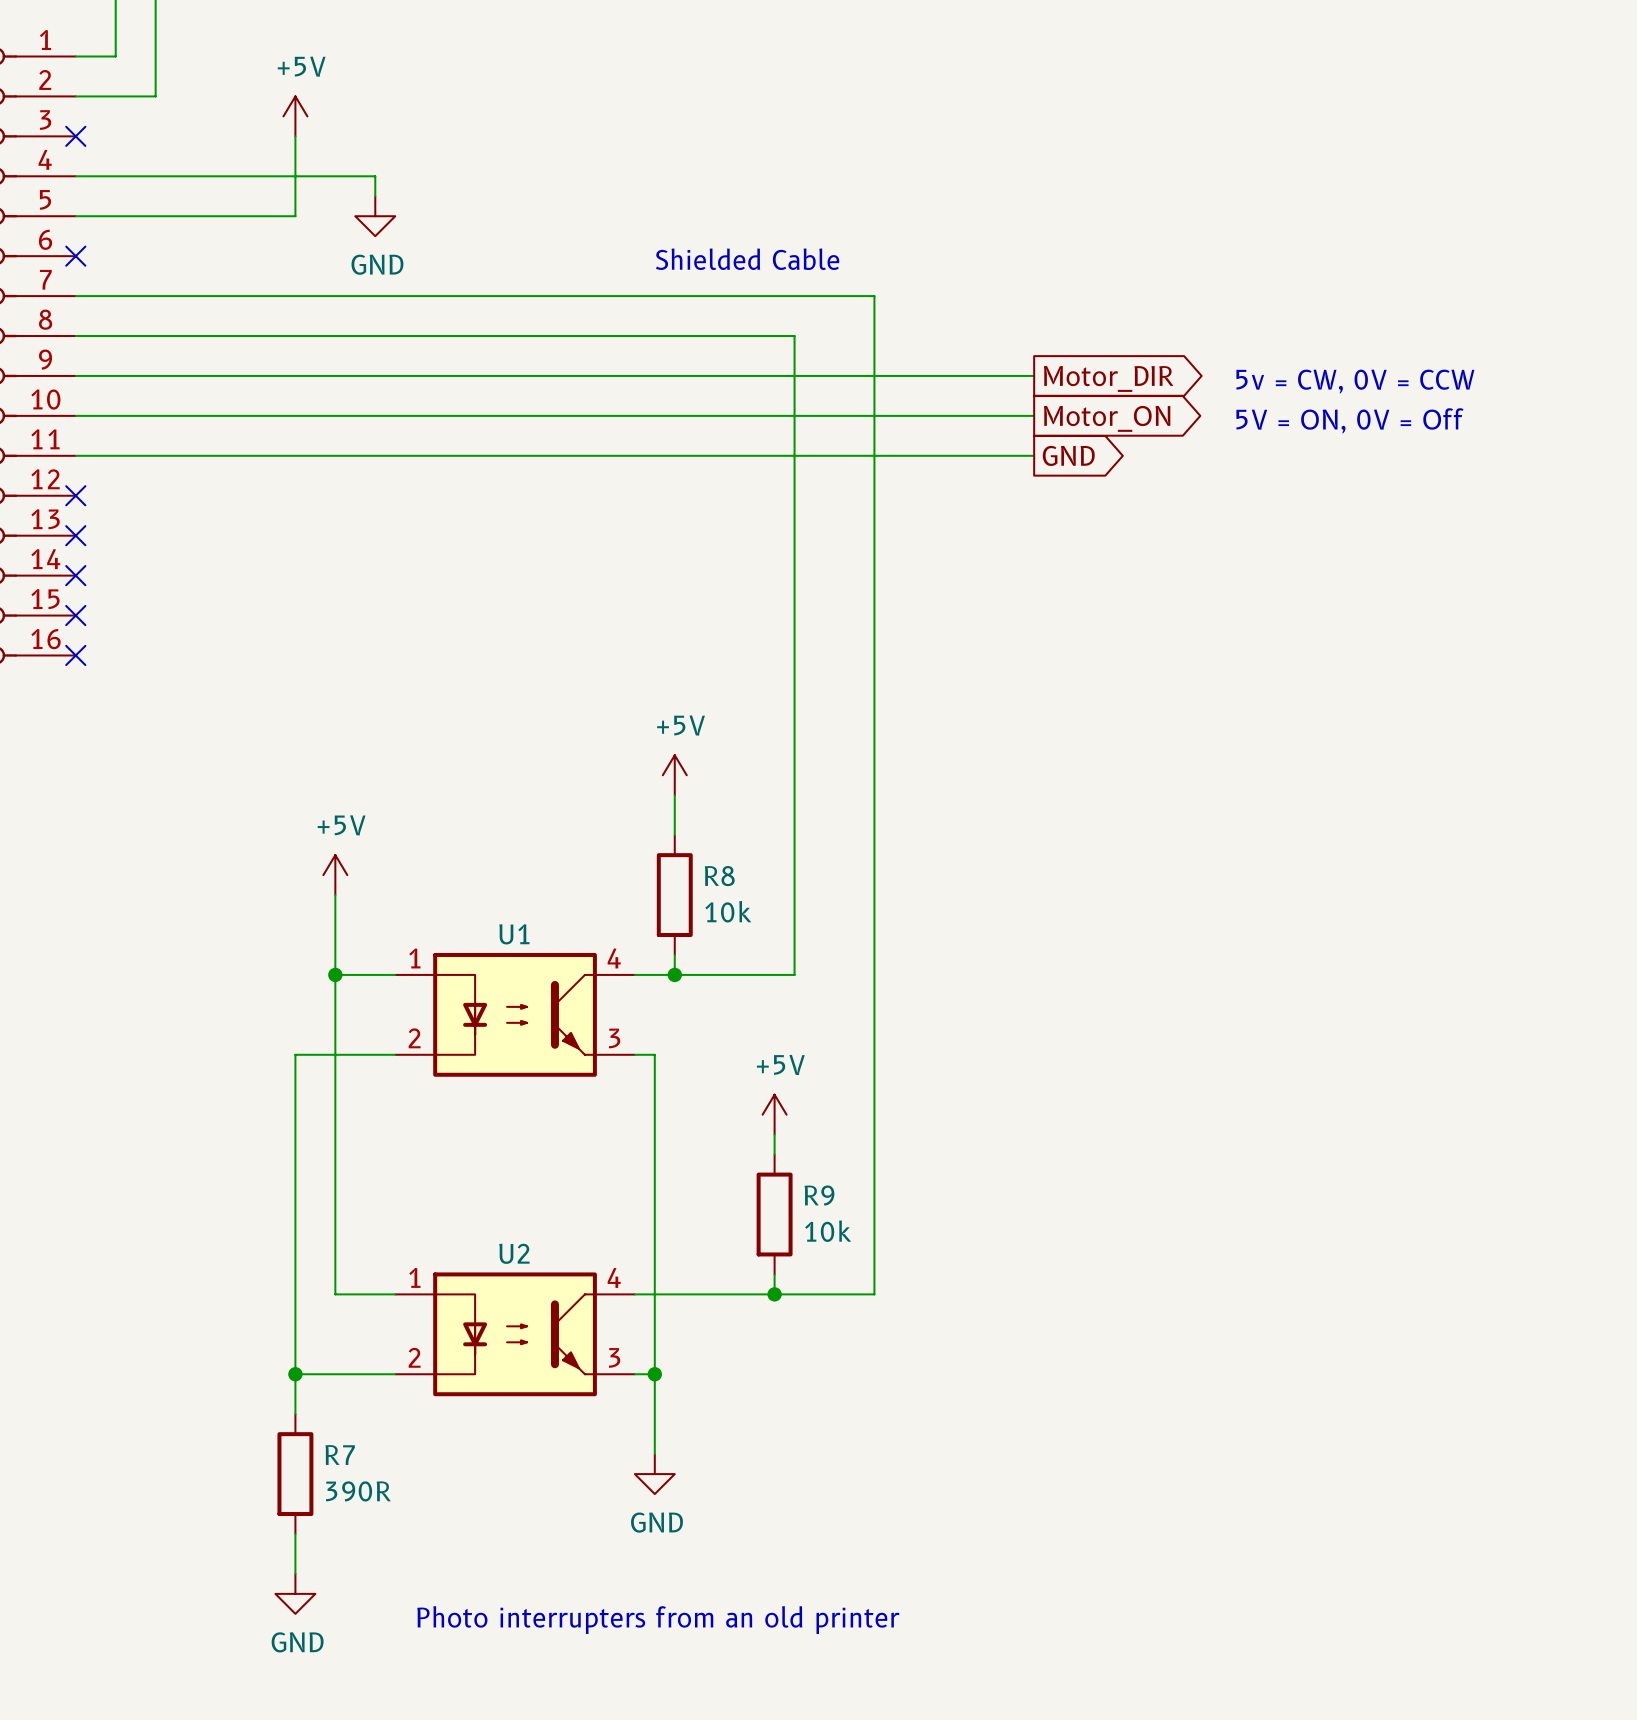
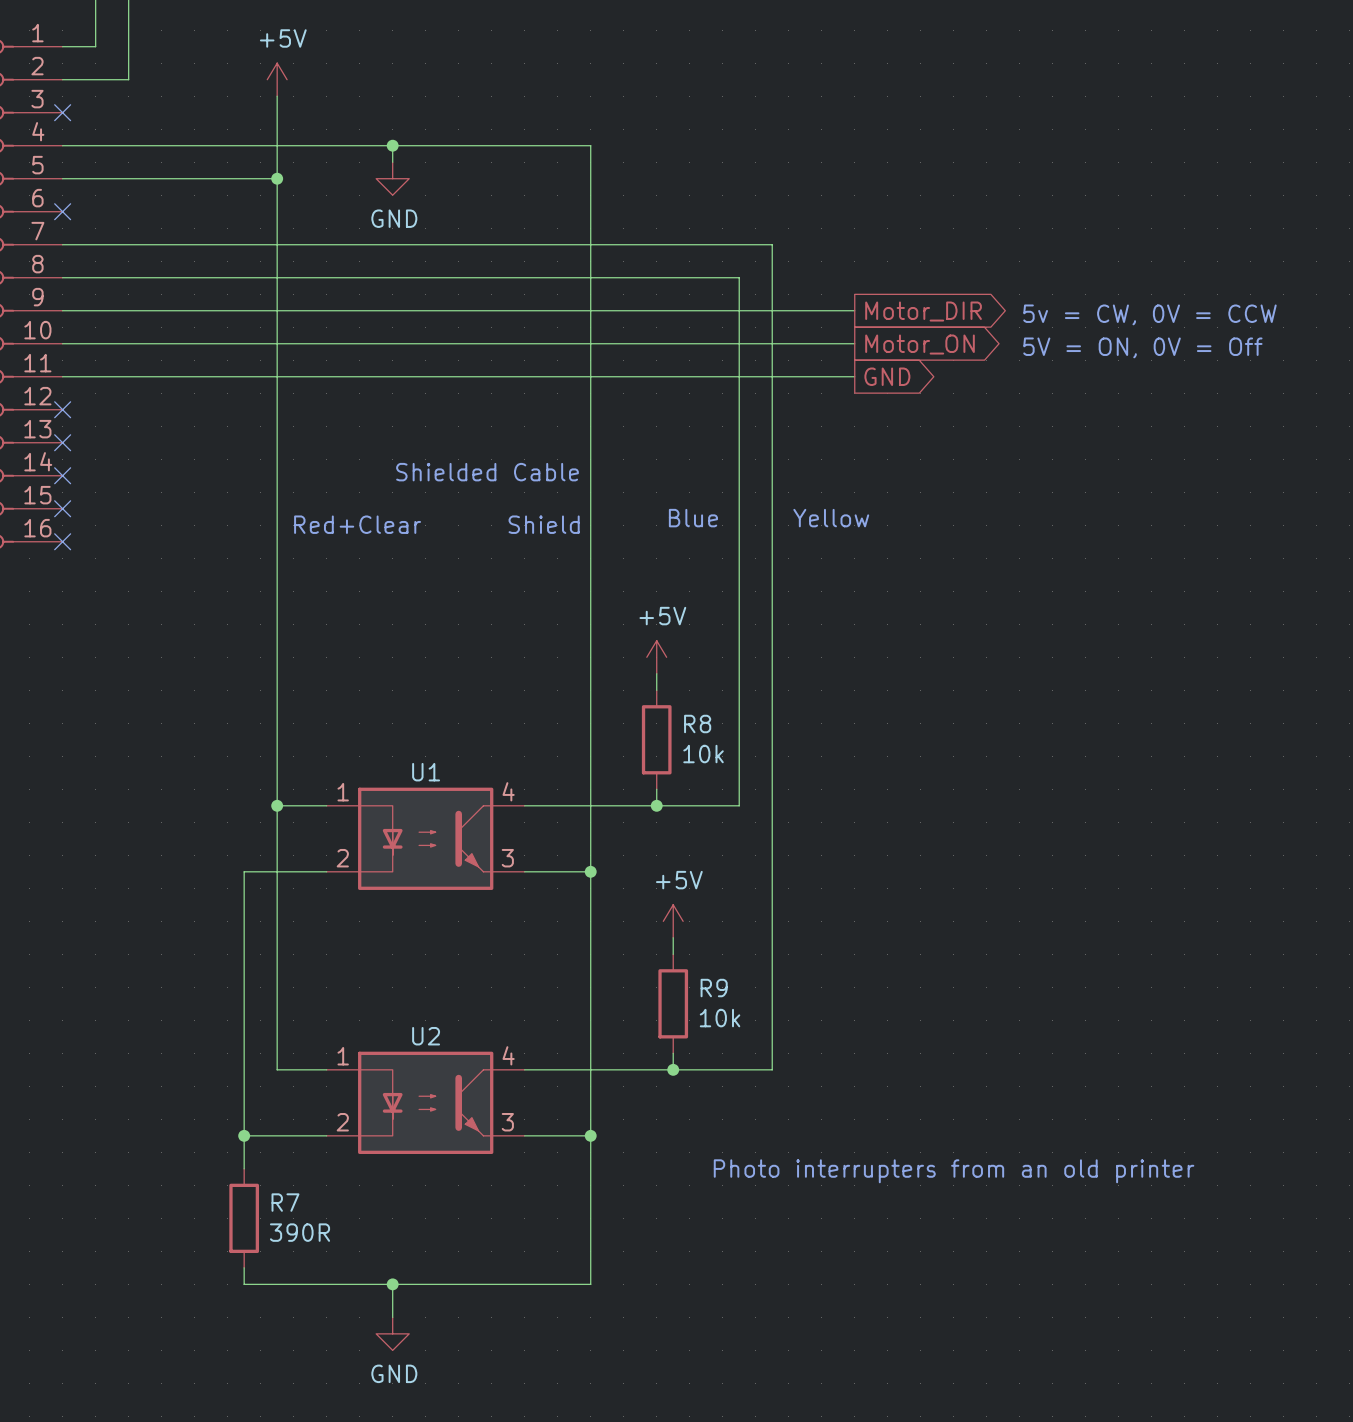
power symbol position: +5V (295, 116) -> +5V (277, 79)
wire: none -> (277, 96) (277, 739)
wire: (295, 136) (295, 216) -> (277, 178) (244, 178)
wire: (375, 176) (375, 196) -> (310, 145) (590, 145) (590, 1284) (244, 1284)
wire: none -> (392, 145) (392, 162)
junction: none -> (392, 145)
junction: none -> (277, 178)
power symbol position: GND (375, 216) -> GND (392, 178)
text position: Shielded Cable (747, 259) -> Shielded Cable (487, 472)
wire: (874, 296) (874, 1294) -> (722, 244) (772, 244) (772, 1069) (722, 1069)
wire: (794, 336) (794, 815) -> (656, 277) (739, 277) (739, 805) (656, 805)
text: none -> Blue (693, 518)
text: none -> Yellow (831, 518)
text: none -> Red+Clear (357, 524)
text: none -> Shield (544, 524)
power symbol position: +5V (674, 775) -> +5V (656, 657)
wire: (674, 795) (674, 835) -> none
wire: (794, 835) (794, 954) -> none
power symbol: +5V (335, 875) -> none
R8 position: (674, 895) -> (656, 739)
wire: (674, 954) (674, 974) -> none
junction: (674, 974) -> none
junction: none -> (656, 805)
wire: (654, 1054) (654, 1454) -> (541, 871) (590, 871)
junction: none -> (590, 871)
power symbol position: +5V (774, 1114) -> +5V (673, 921)
wire: (774, 1134) (774, 1154) -> (673, 937) (673, 954)
R9 position: (774, 1214) -> (673, 1003)
wire: (774, 1274) (774, 1294) -> (673, 1053) (673, 1069)
junction position: (774, 1294) -> (673, 1069)
wire: none -> (541, 1135) (590, 1135)
junction: (654, 1374) -> none
junction: none -> (590, 1135)
text: none -> Photo interrupters from an old printer (954, 1171)
power symbol: GND (654, 1474) -> none
wire: (295, 1553) (295, 1573) -> none
wire: none -> (392, 1284) (392, 1317)
junction: none -> (392, 1284)
power symbol: GND (295, 1593) -> none
power symbol: none -> GND (392, 1333)
text: Photo interrupters from an old printer (658, 1620) -> none

